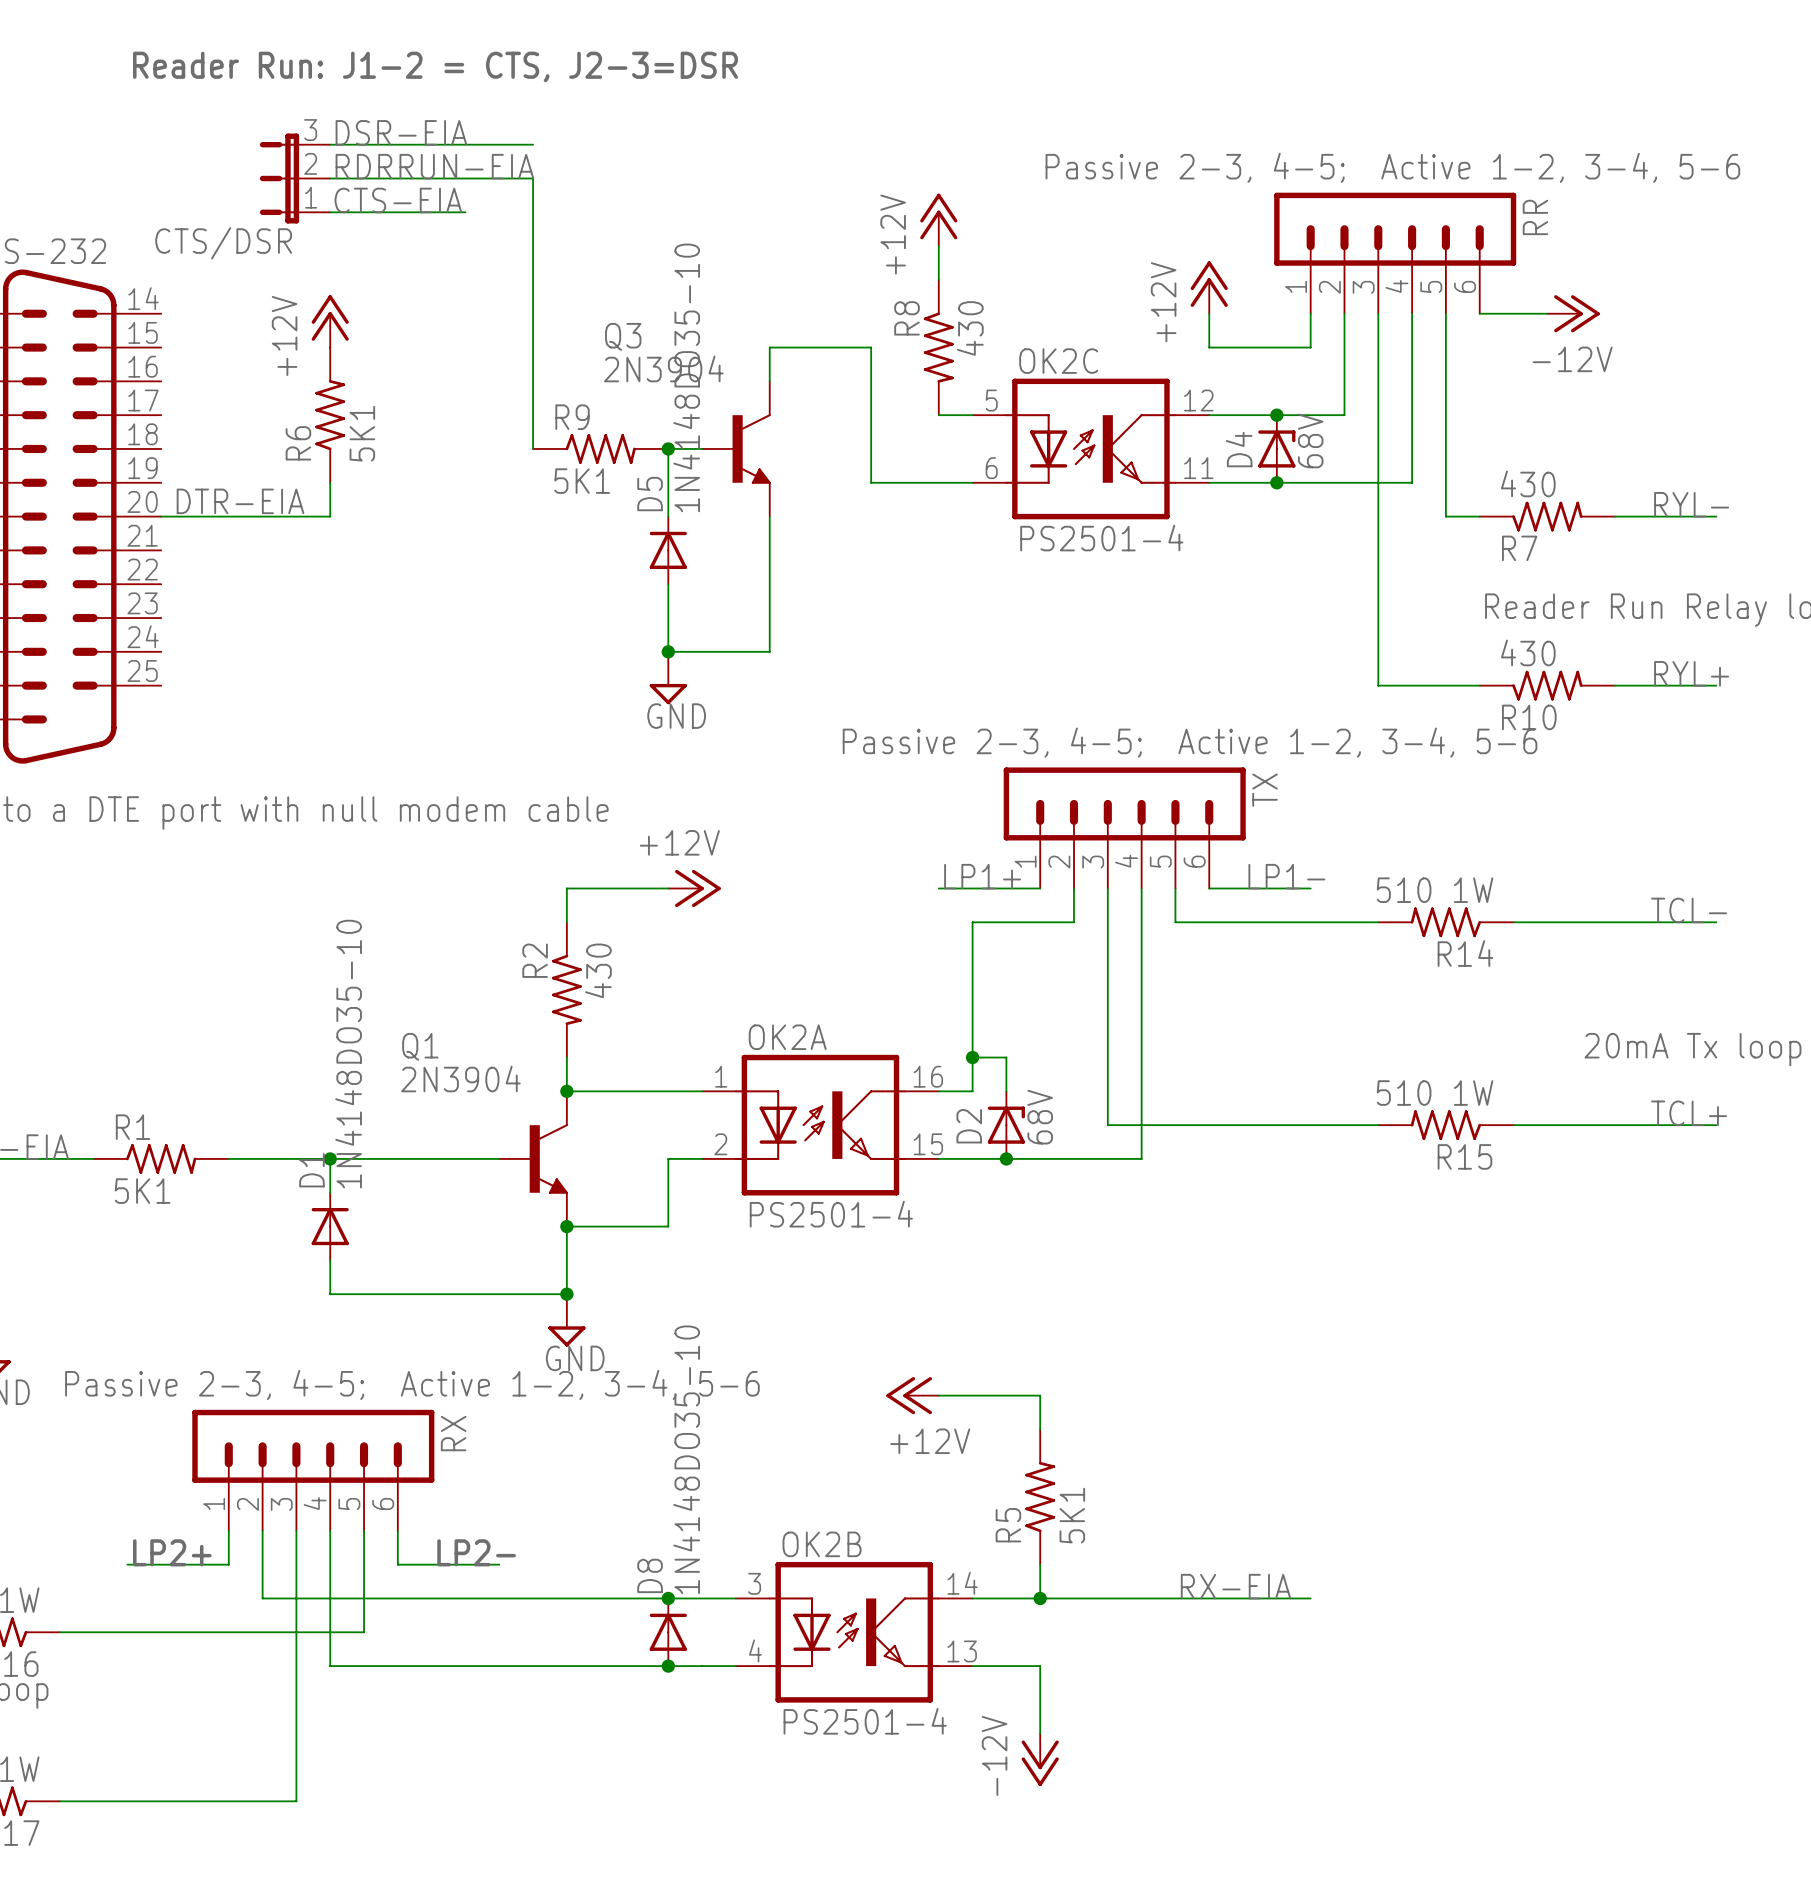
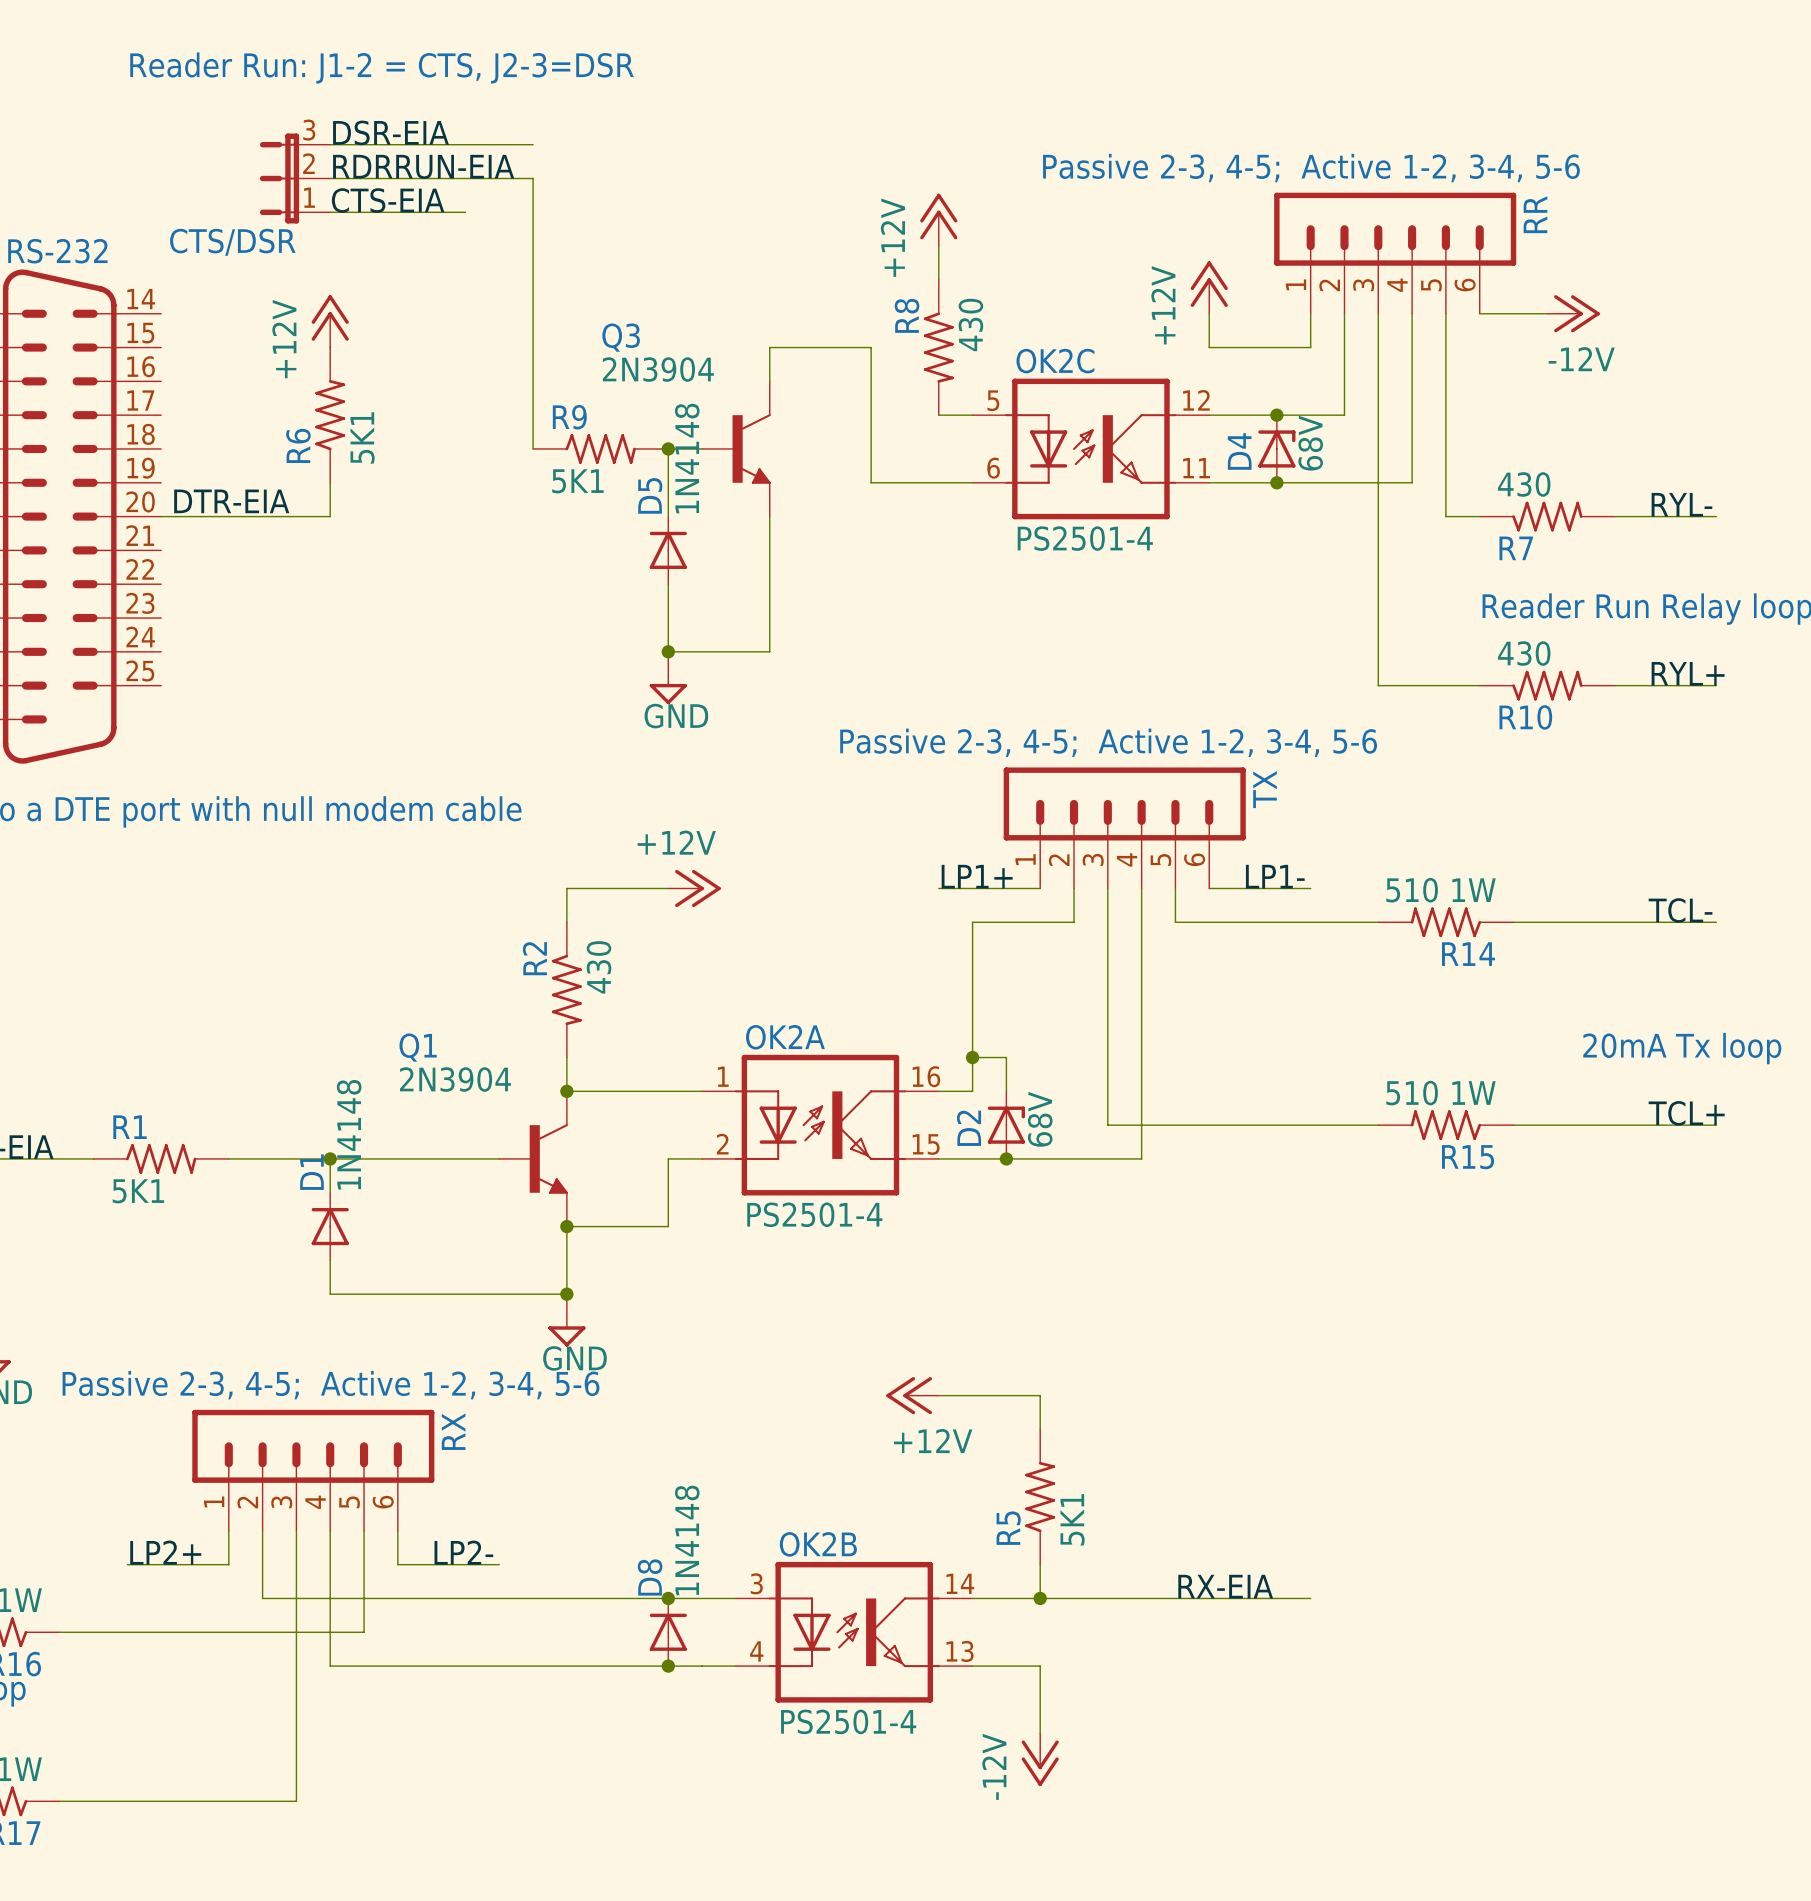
D5 value: 1N4148DO35-10 (686, 377) -> 1N4148 (687, 458)
D1 value: 1N4148DO35-10 (348, 1054) -> 1N4148 (349, 1134)
D8 value: 1N4148DO35-10 (686, 1459) -> 1N4148 (687, 1540)

